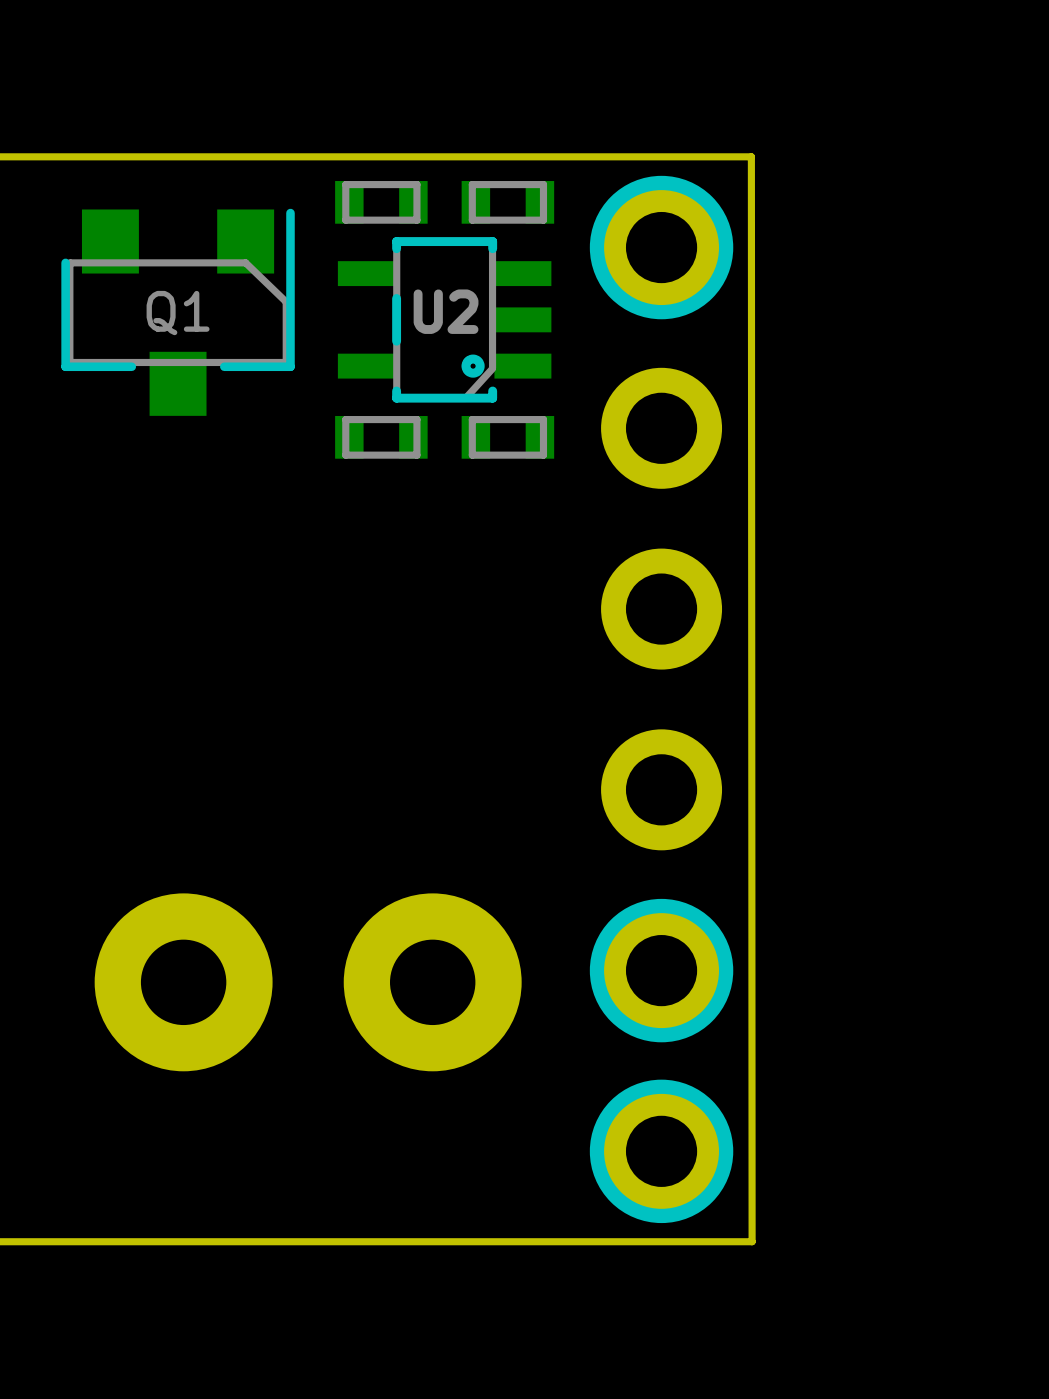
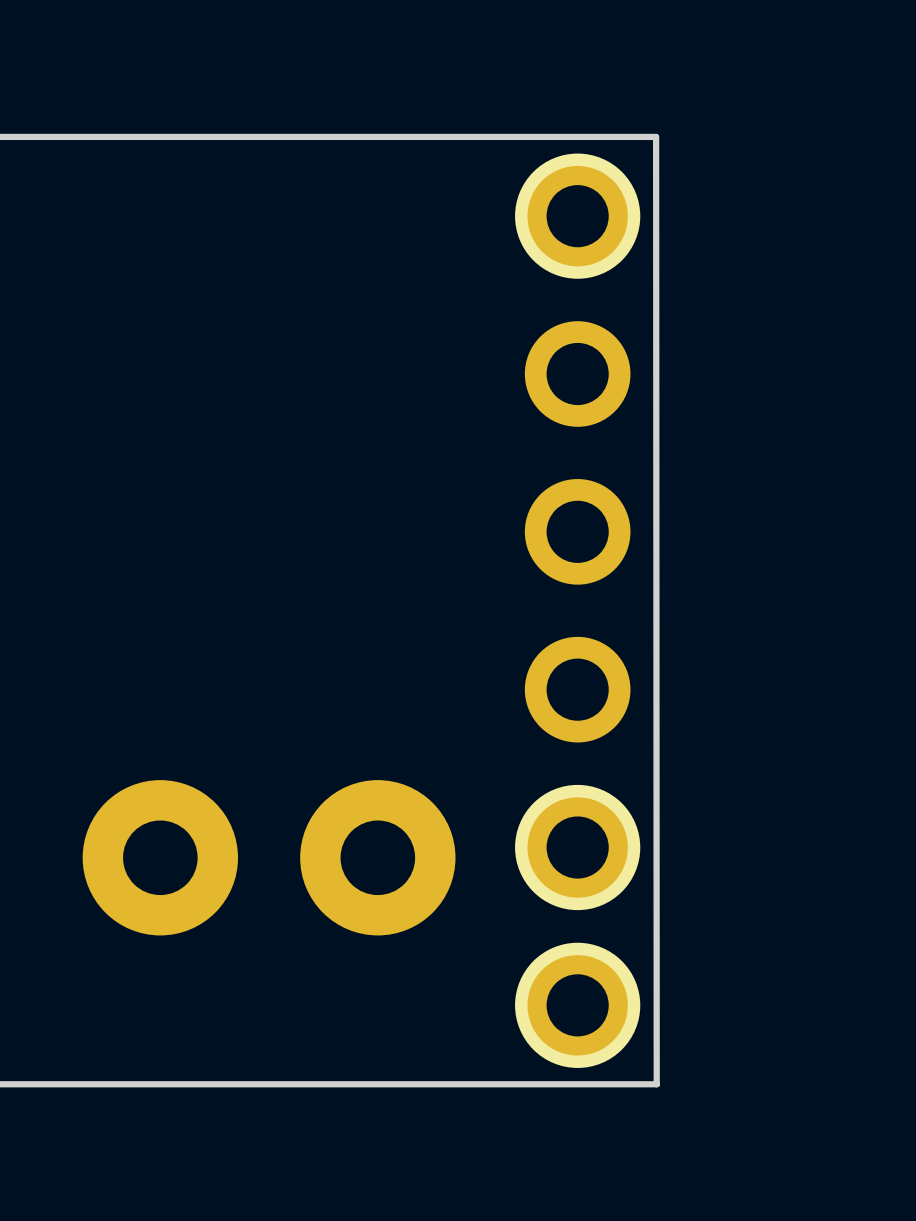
part: (381, 202) -> none
part: (507, 202) -> none
Q1: (178, 312) -> none
U2: (444, 319) -> none
part: (381, 437) -> none
part: (507, 437) -> none

